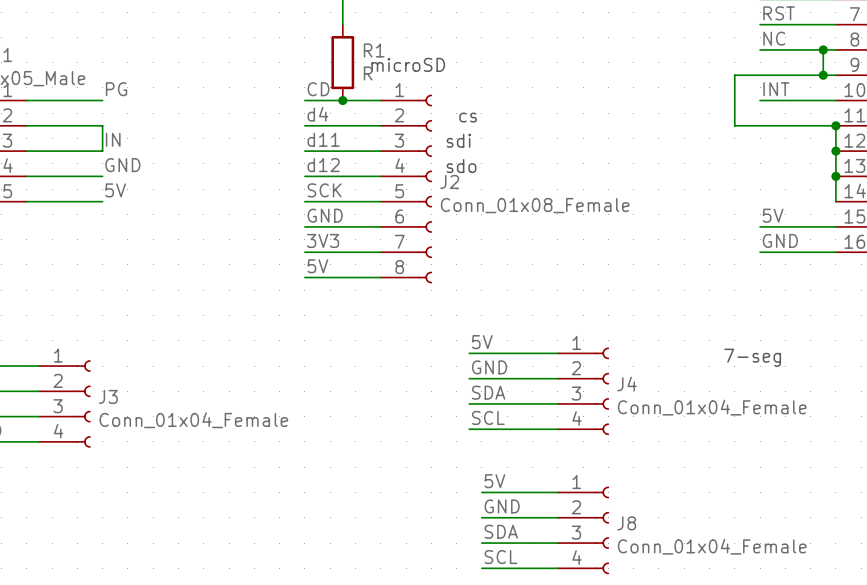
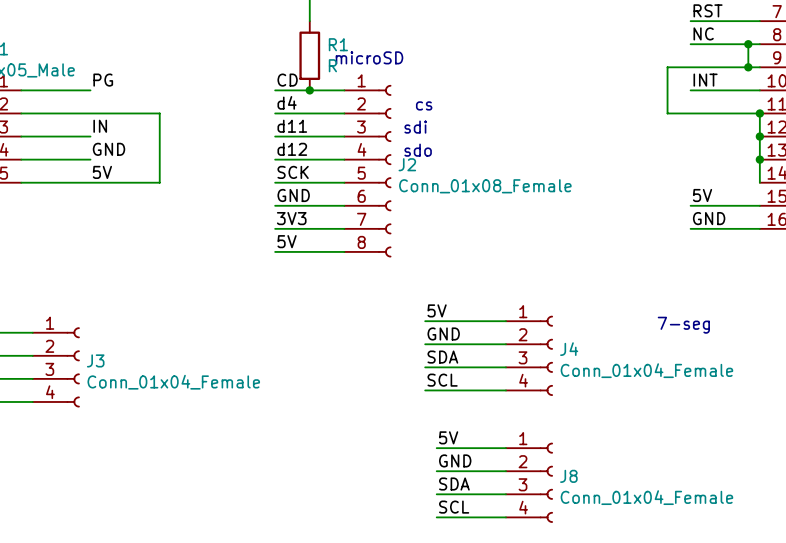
wire: (102, 125) (102, 151) -> (90, 113) (159, 113) (159, 182) (90, 182)

